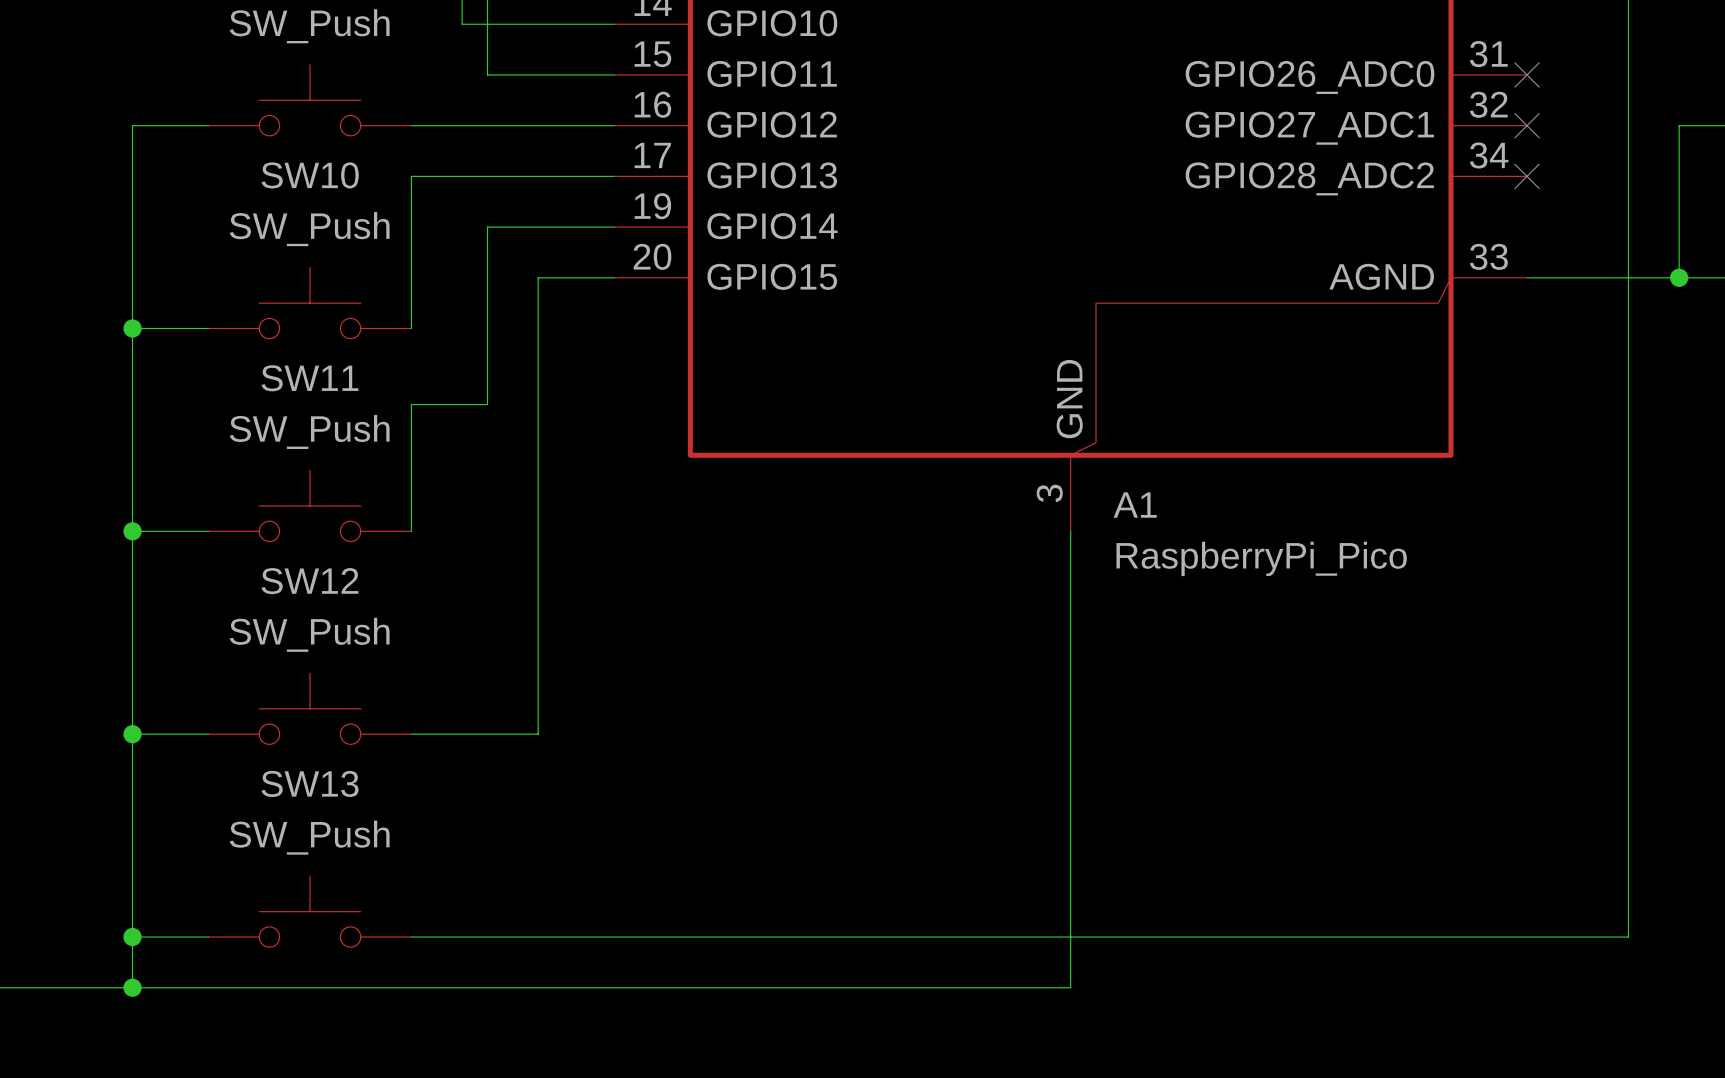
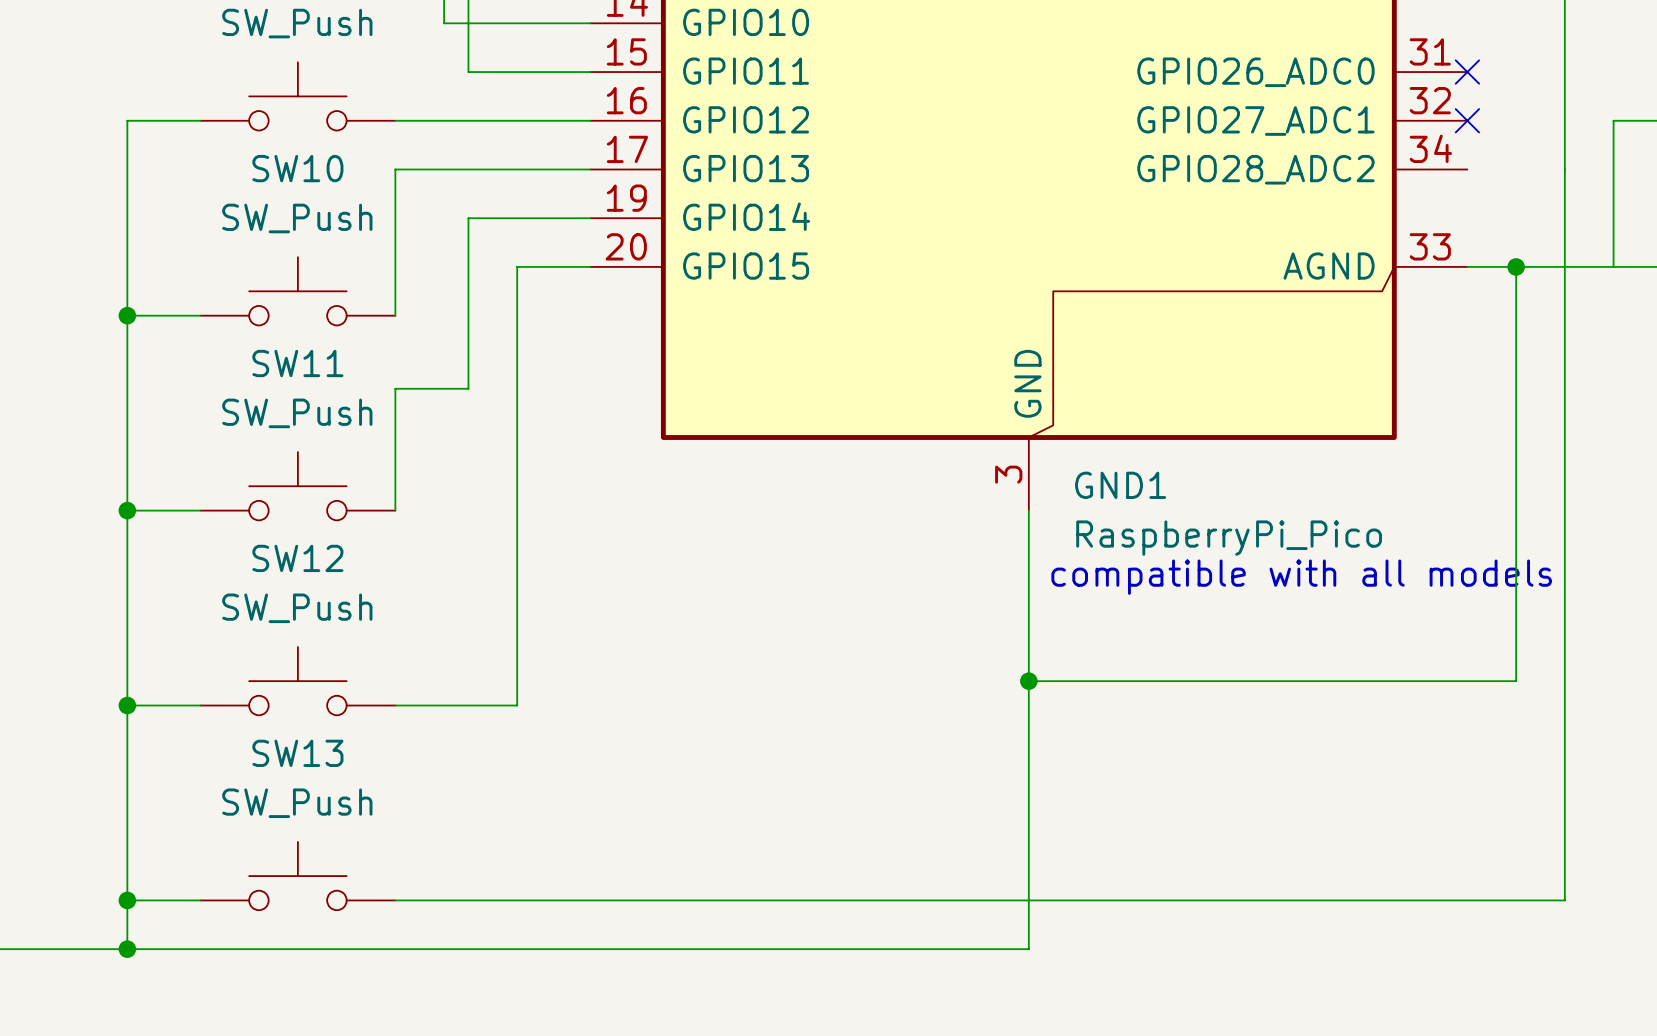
no-connect mark: (1527, 176) -> none
wire: none -> (1516, 266) (1516, 681) (1028, 681)
junction: none -> (1516, 266)
junction: (1679, 277) -> none
A1 name: A1 (1135, 505) -> GND1 (1120, 485)
text: none -> compatible with all models (1301, 577)
junction: none -> (1028, 681)

